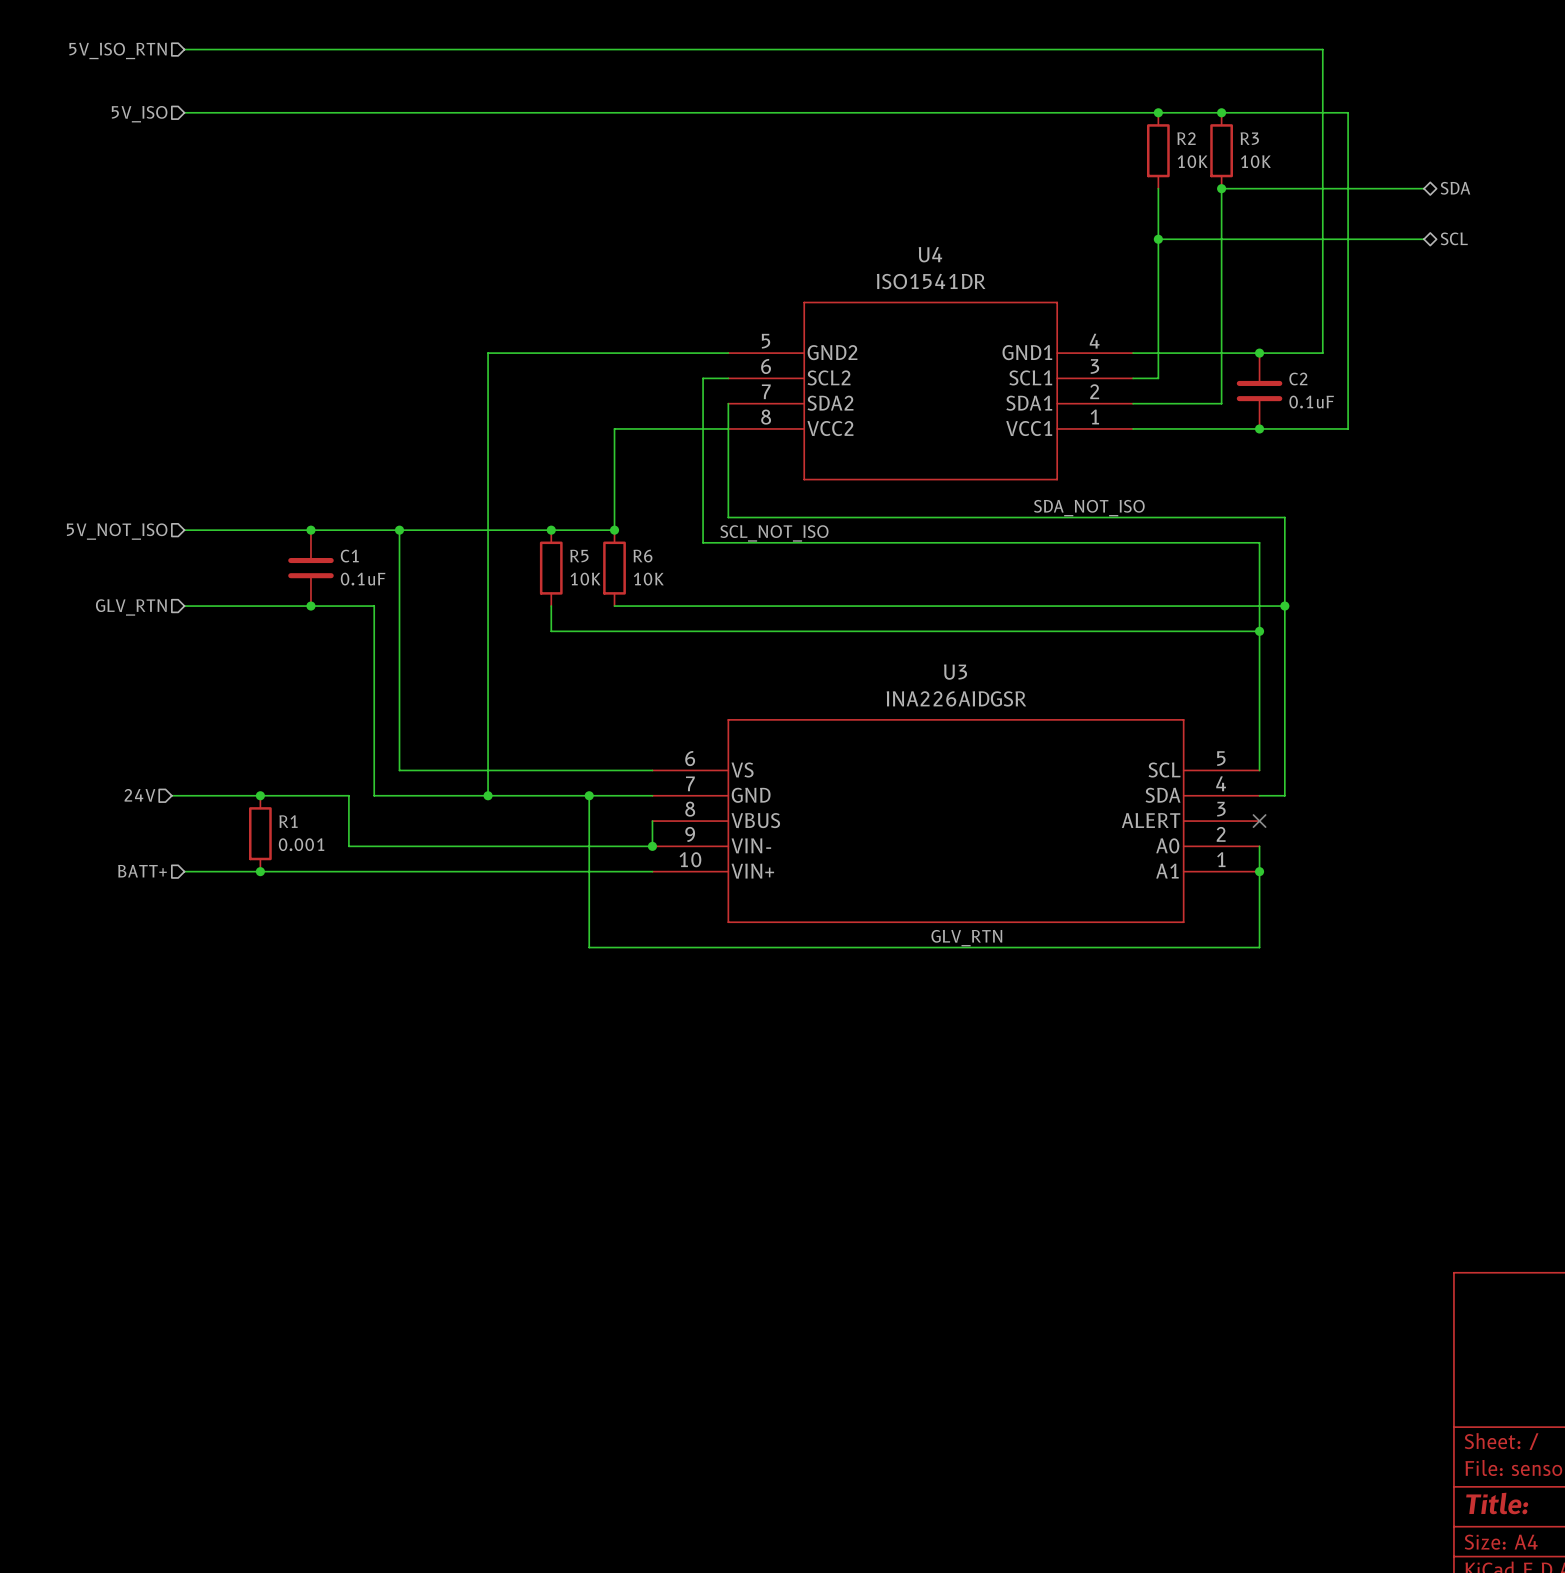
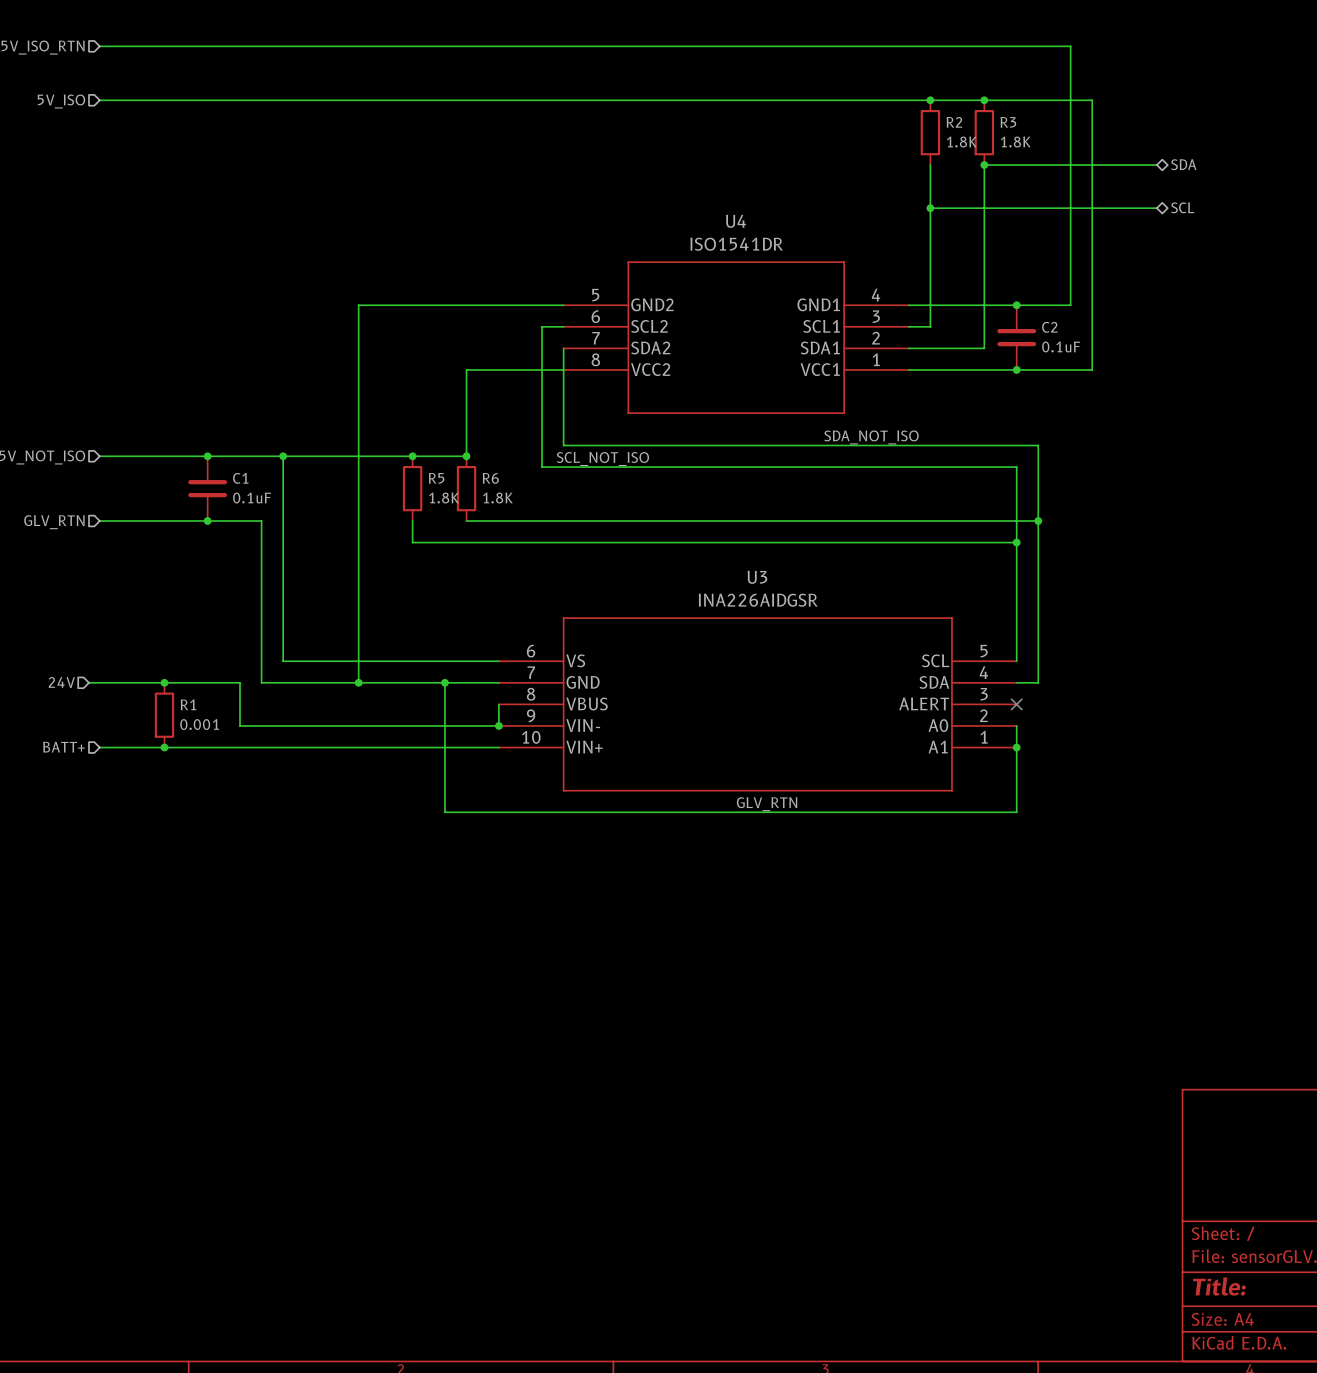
R2 value: 10K (1192, 161) -> 1.8K (961, 142)
R3 value: 10K (1255, 161) -> 1.8K (1015, 142)
R5 value: 10K (585, 579) -> 1.8K (443, 498)
R6 value: 10K (648, 579) -> 1.8K (497, 498)

